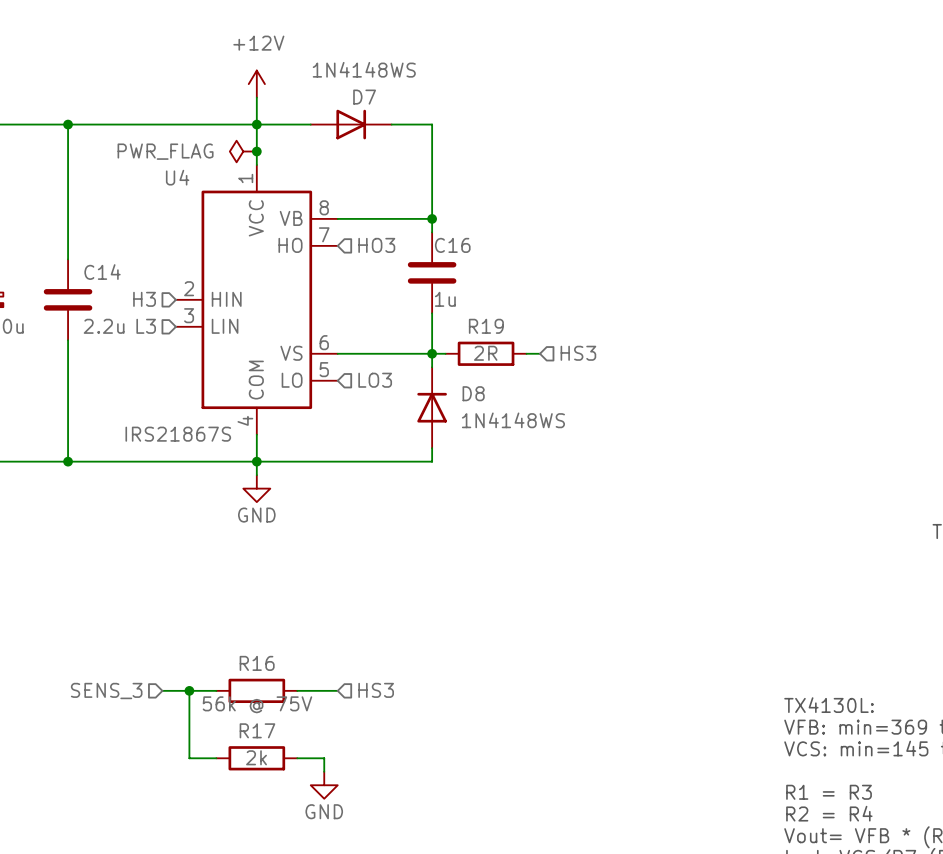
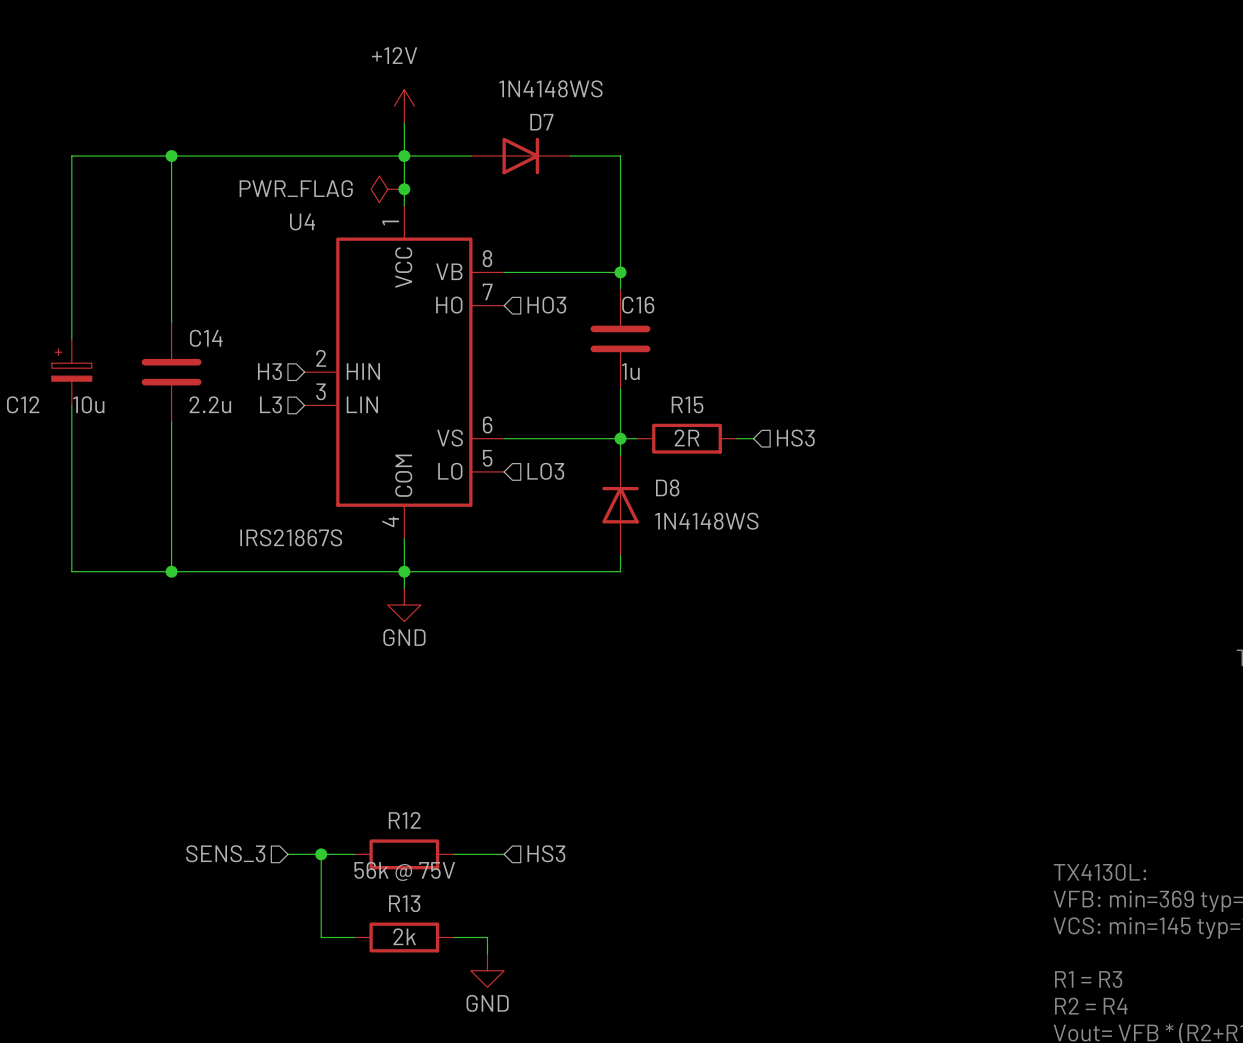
R19 name: R19 (486, 326) -> R15 (687, 404)
R16 name: R16 (257, 663) -> R12 (404, 820)
R17 name: R17 (257, 730) -> R13 (404, 903)

